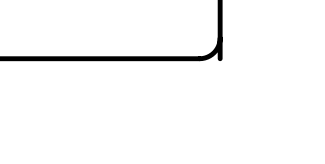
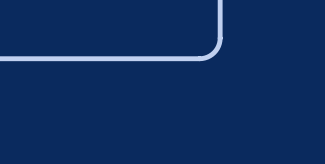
board edge: (220, 38) (220, 58) -> none

